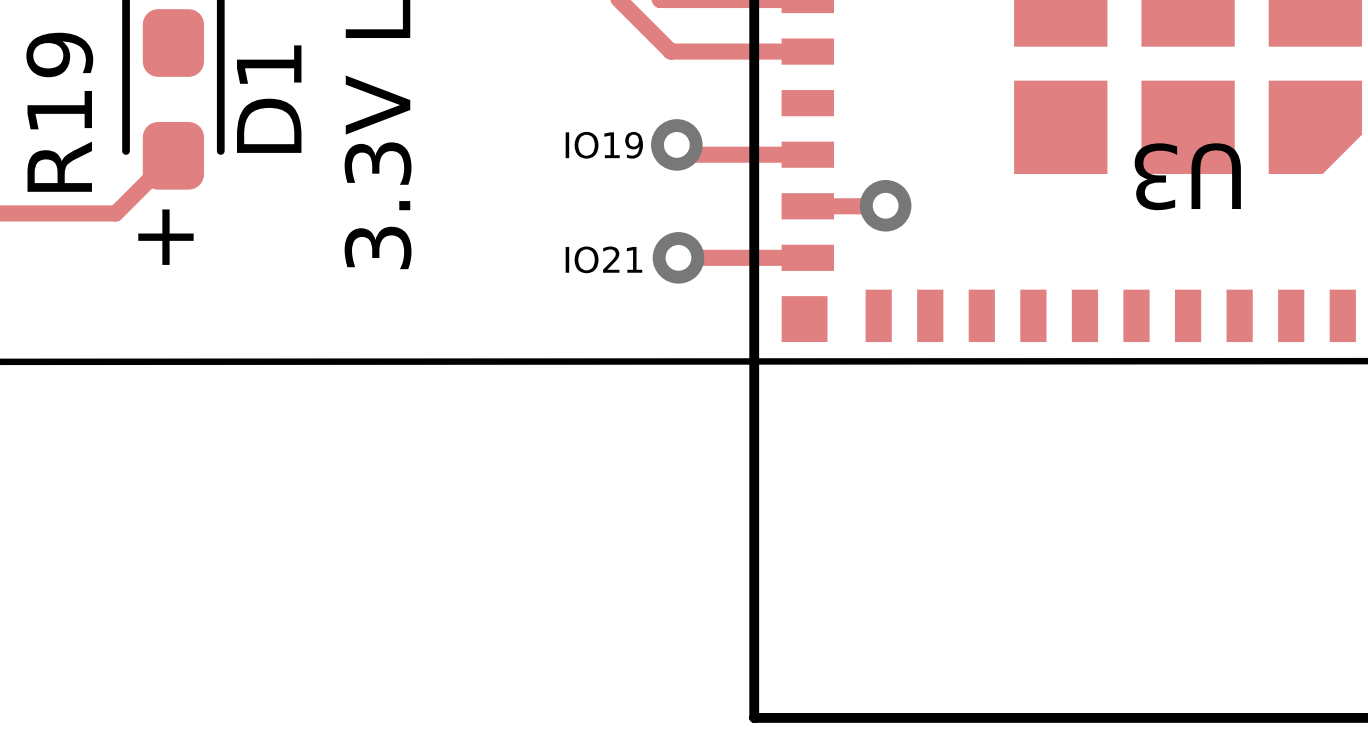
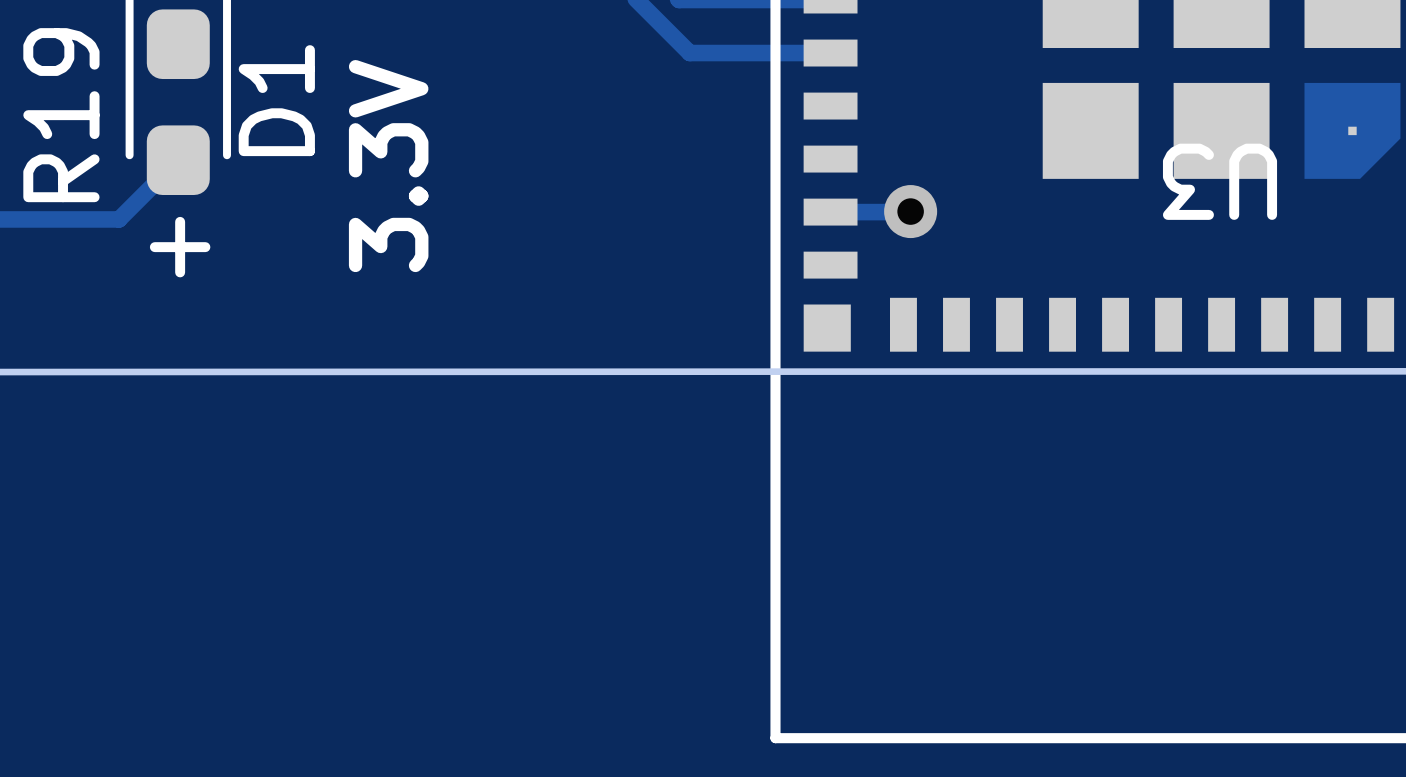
track: (676, 144) (686, 154) (807, 154) -> none
via: (676, 144) -> none
text: IO19 (604, 145) -> none
via: (678, 257) -> none
track: (807, 257) (678, 257) (676, 259) -> none
text: IO21 (603, 259) -> none

